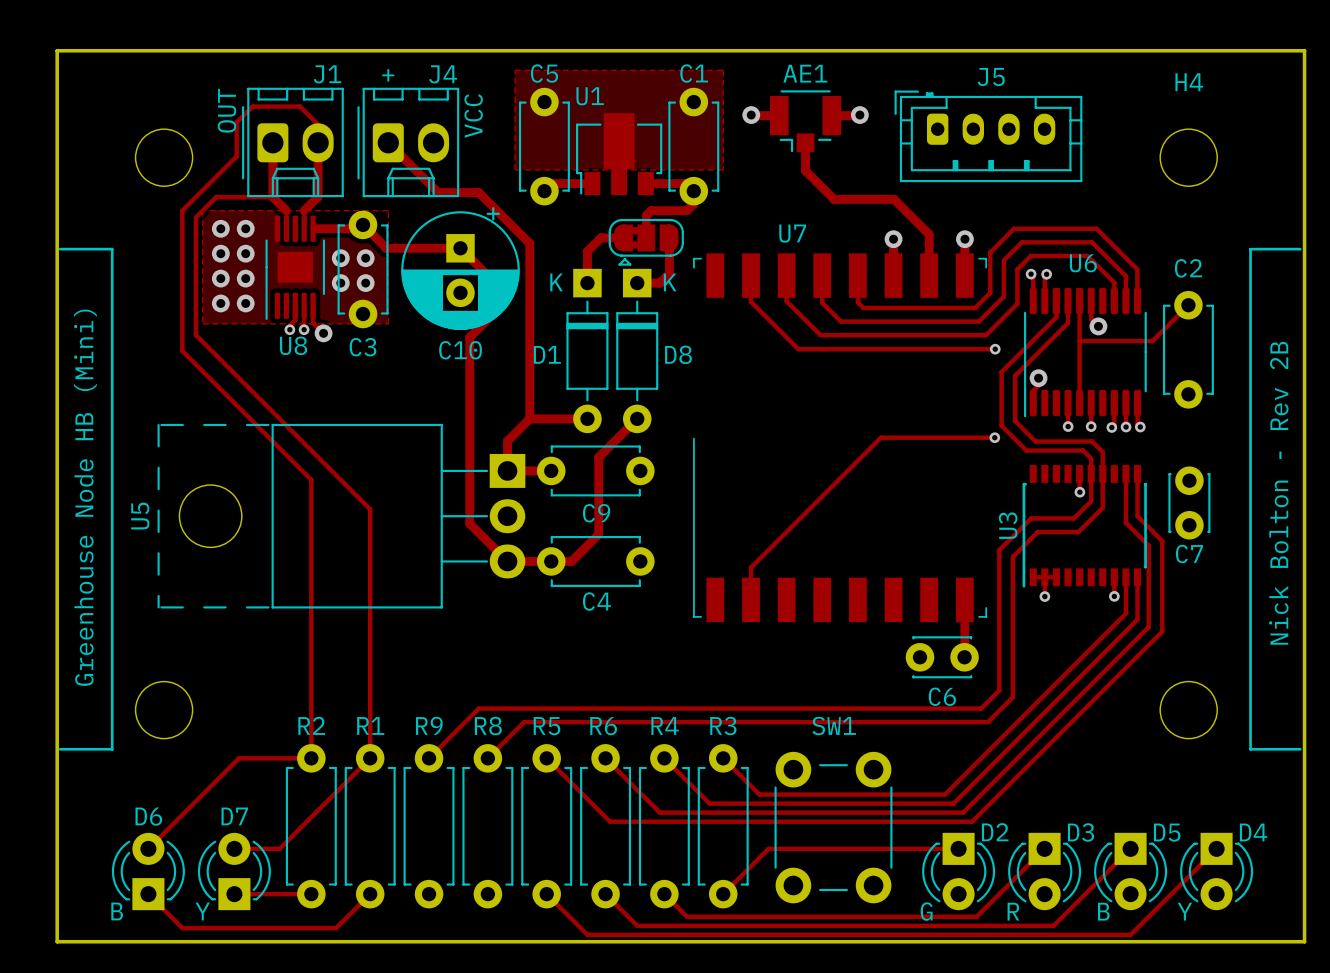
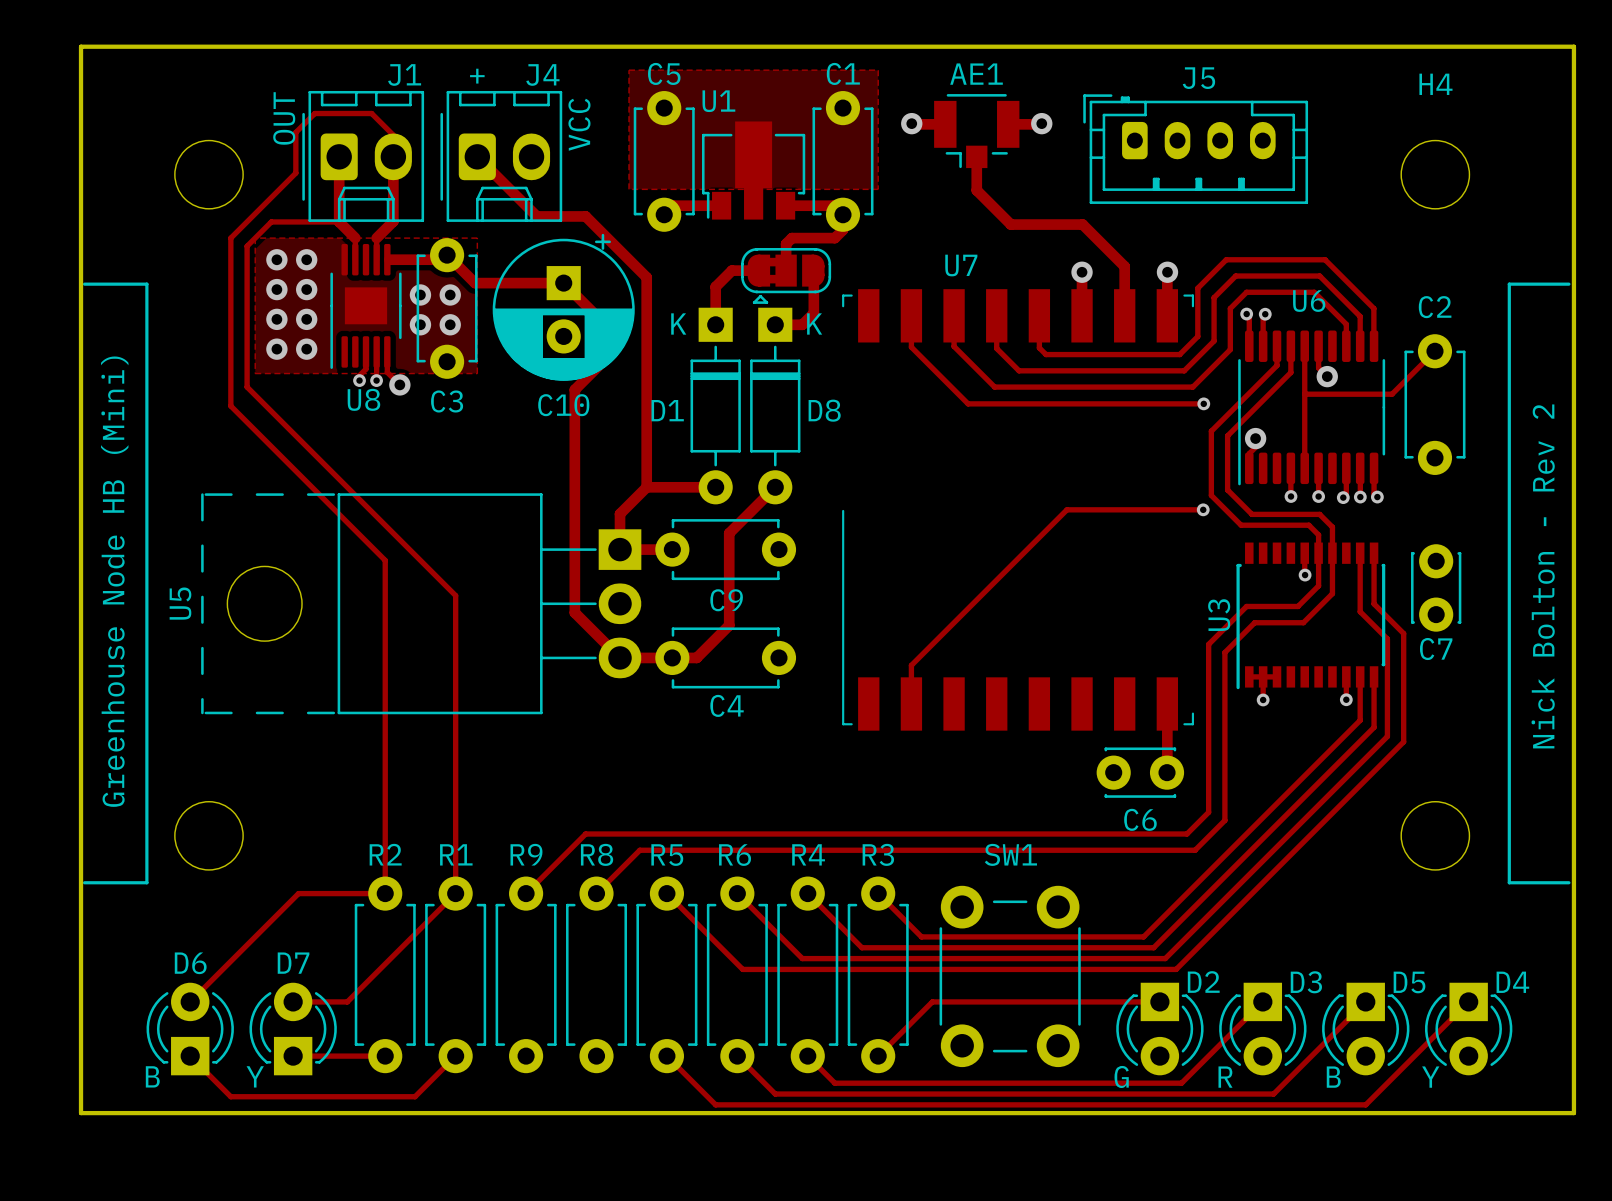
text: Nick Bolton - Rev 2B (1278, 493) -> Nick Bolton - Rev 2 (1543, 576)

